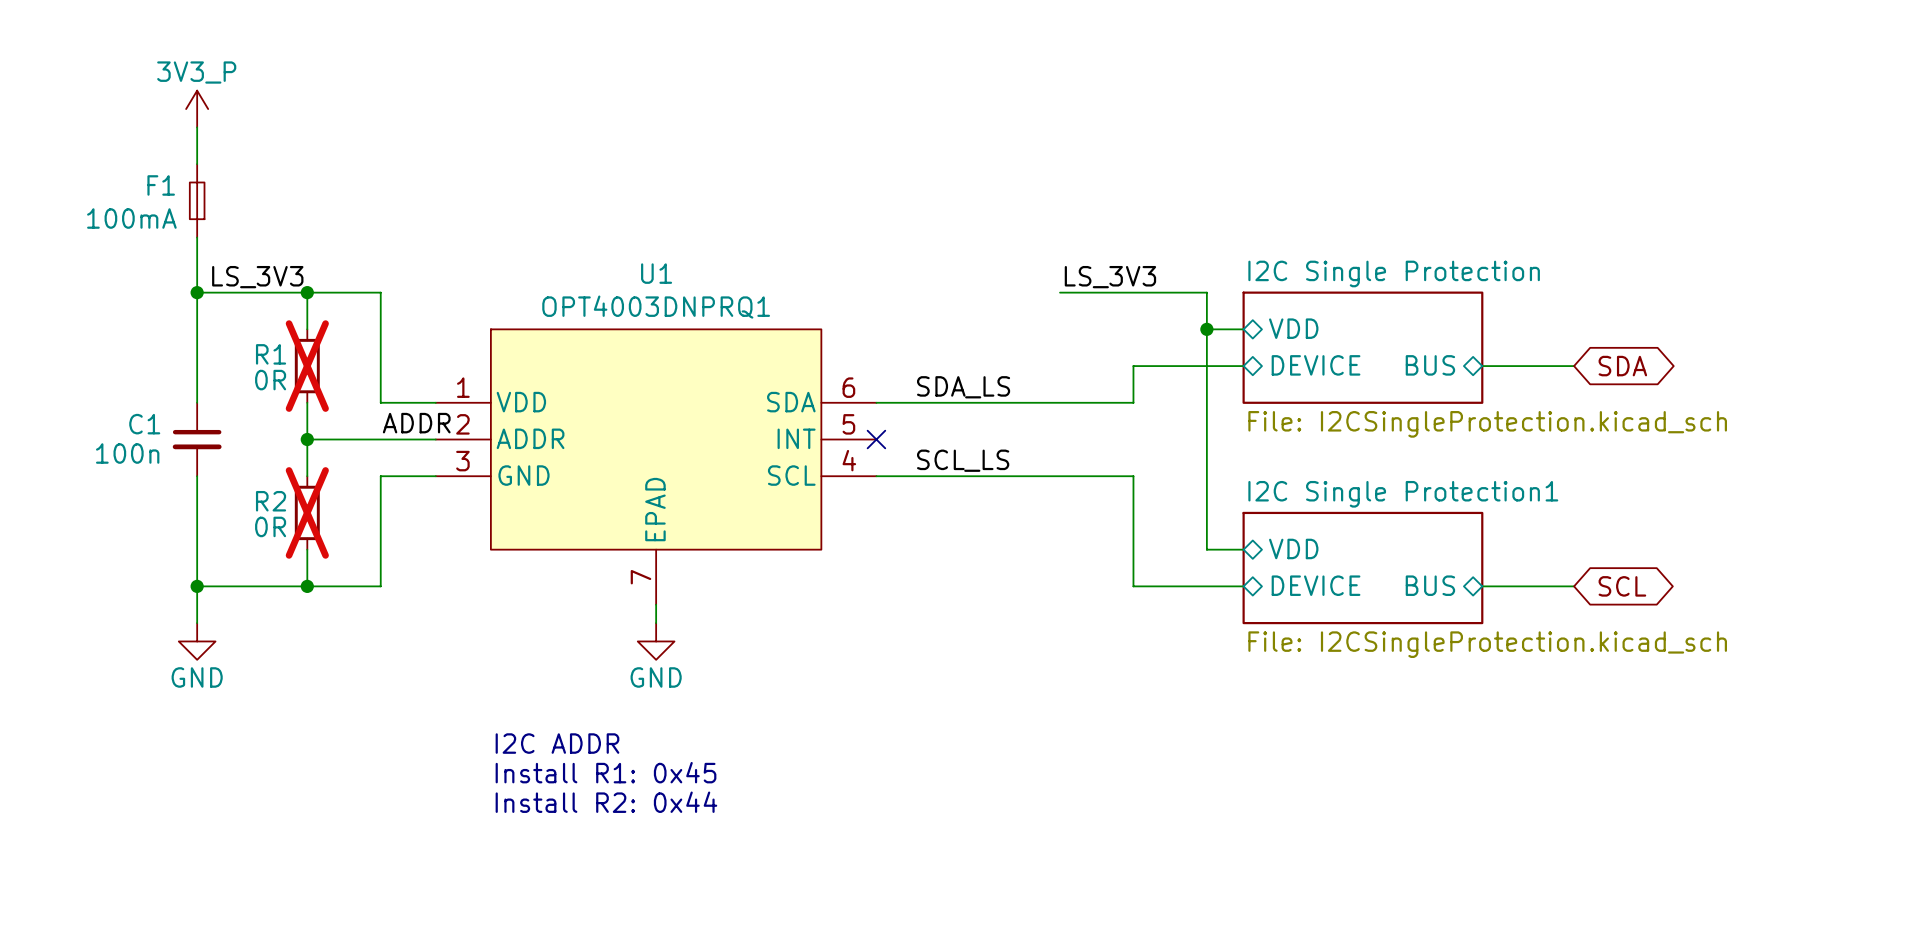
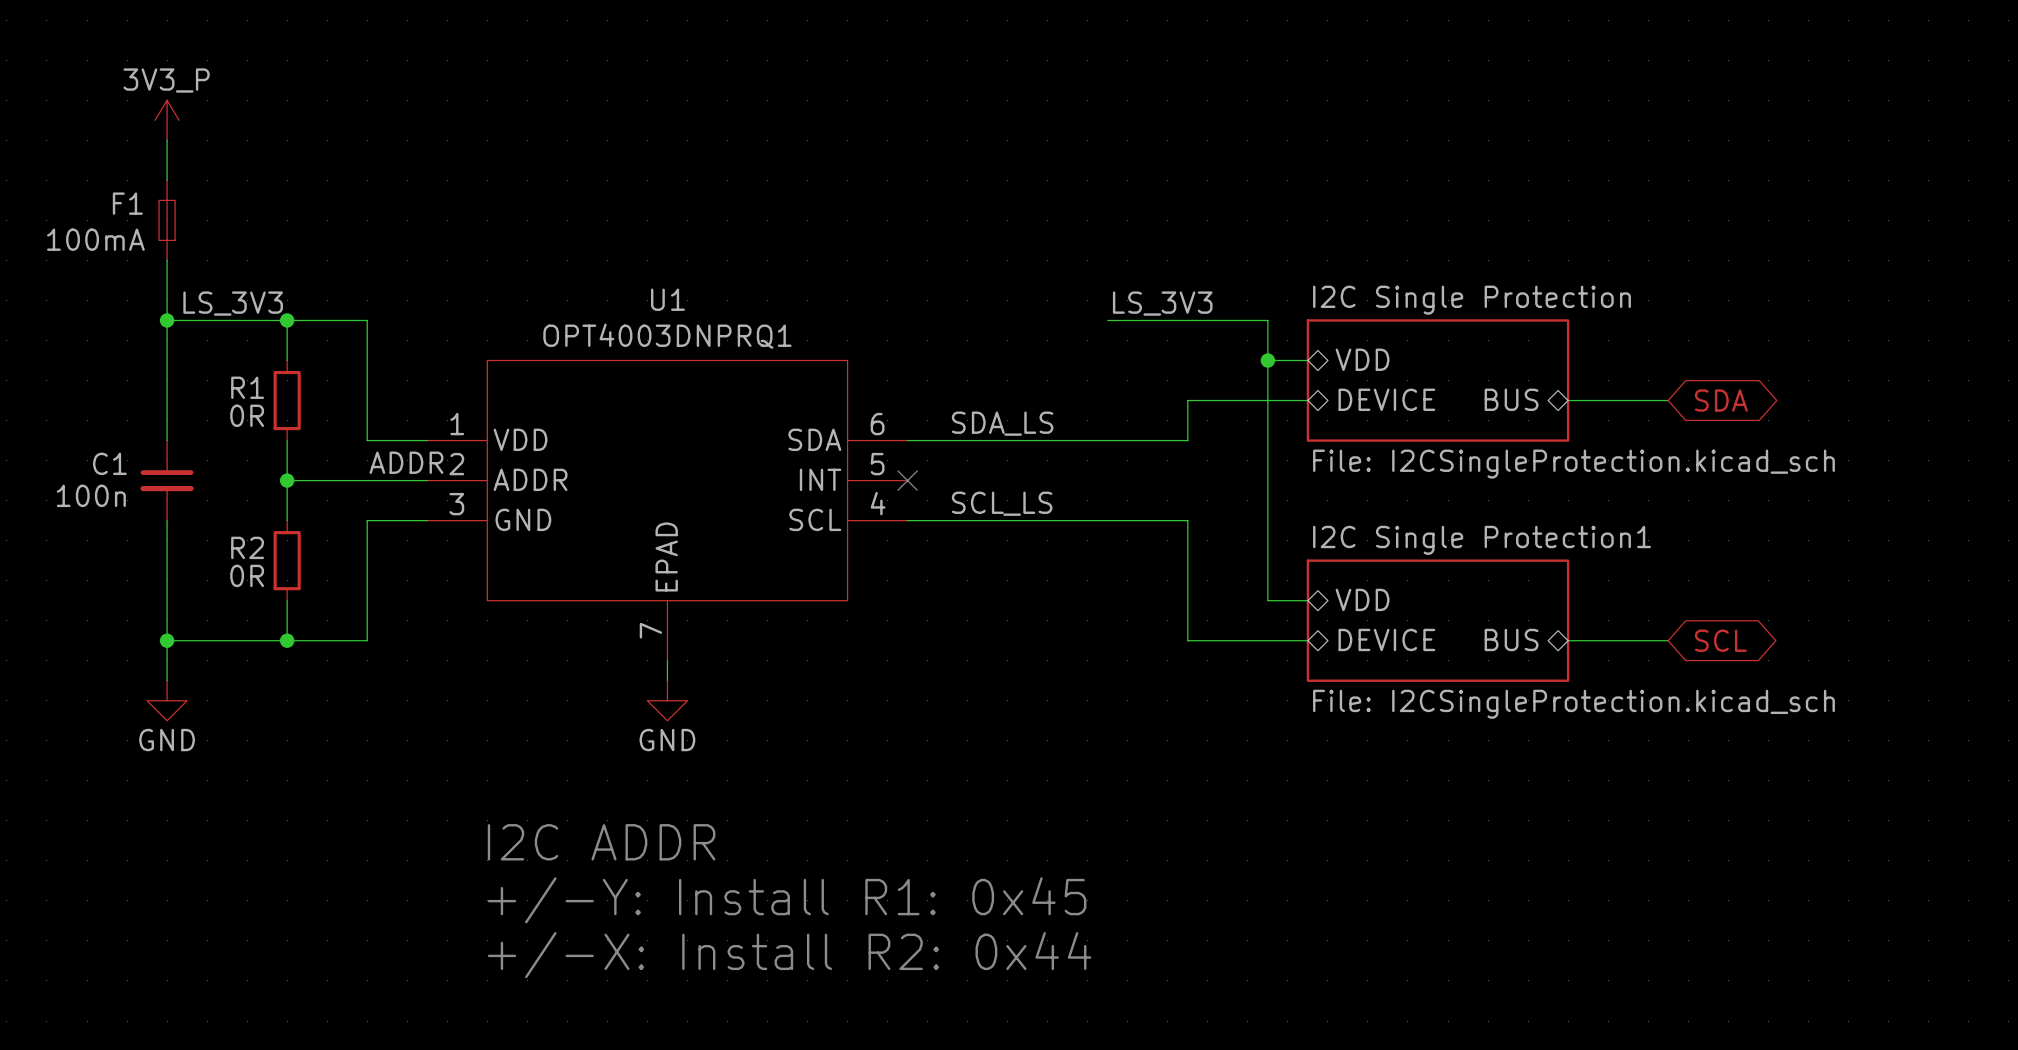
R1 do-not-place cross: (307, 366) -> none
R2 do-not-place cross: (307, 512) -> none
text: I2C ADDR (557, 743) -> none
text: Install R1: 0x45 (606, 772) -> I2C ADDR (601, 842)
text: Install R2: 0x44 (606, 802) -> +/-Y: Install R1: 0x45 (787, 900)
text: none -> +/-X: Install R2: 0x44 (789, 955)

